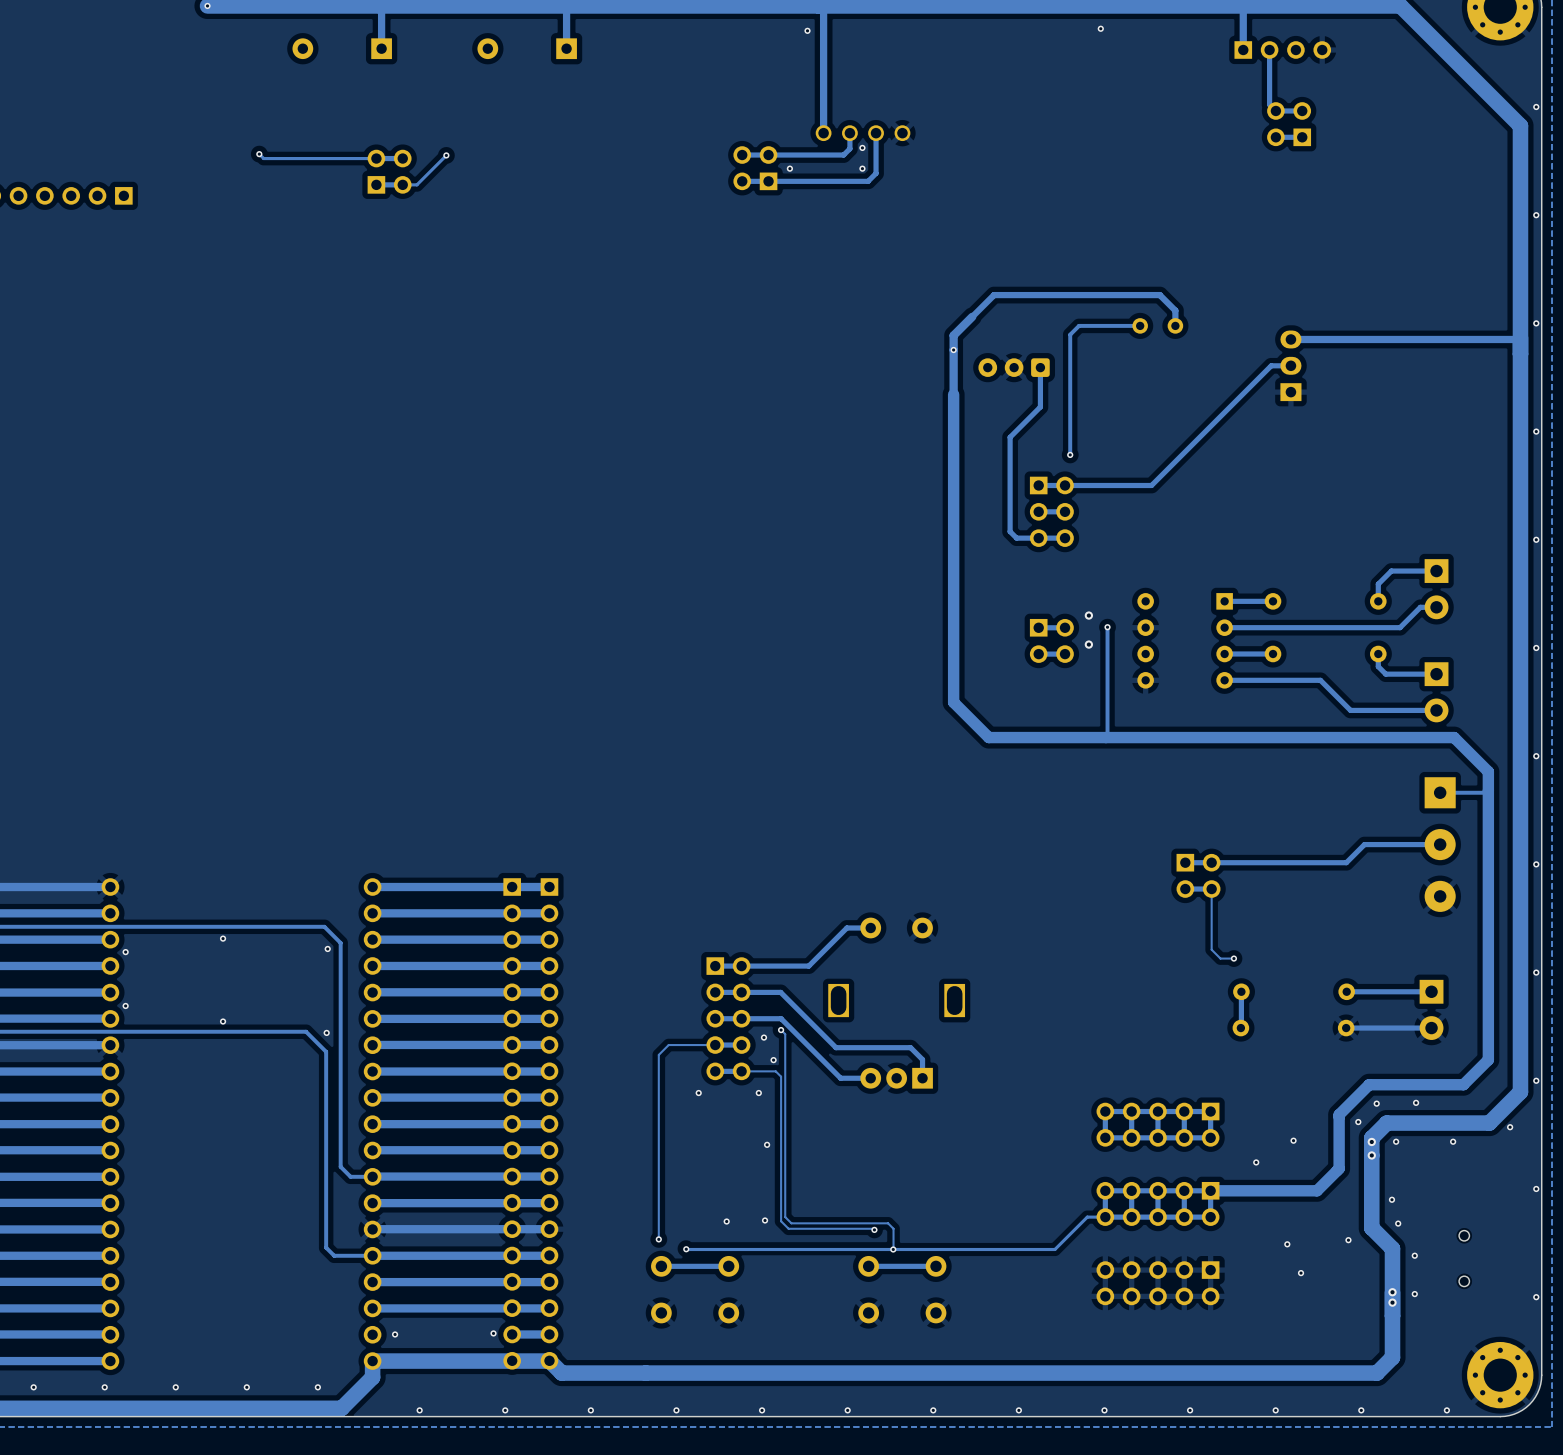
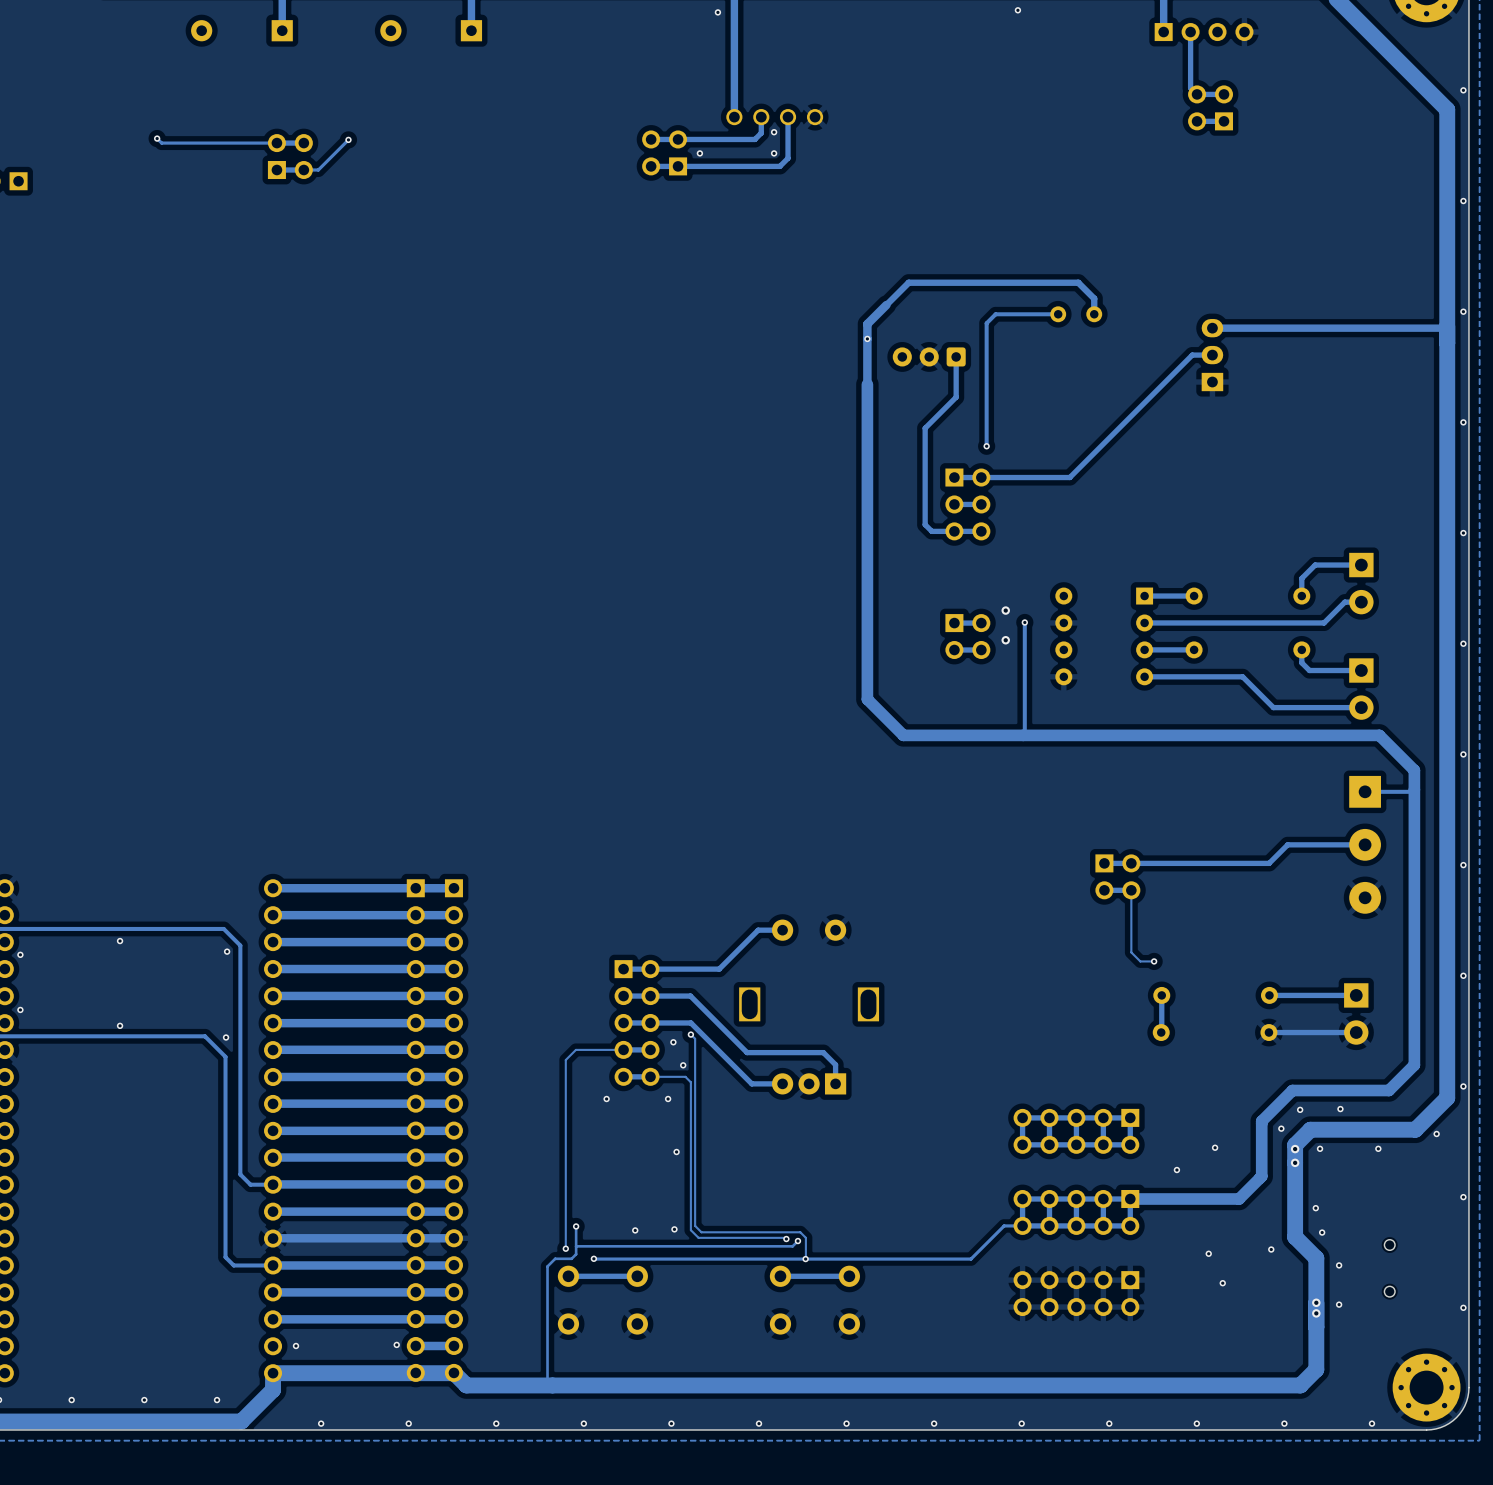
track: none -> (576, 1226) (576, 1254) (571, 1258) (555, 1258) (547, 1266) (547, 1380) (552, 1385)
via: none -> (576, 1226)
track: none -> (797, 1241) (792, 1246) (576, 1246)
via: none -> (797, 1241)

